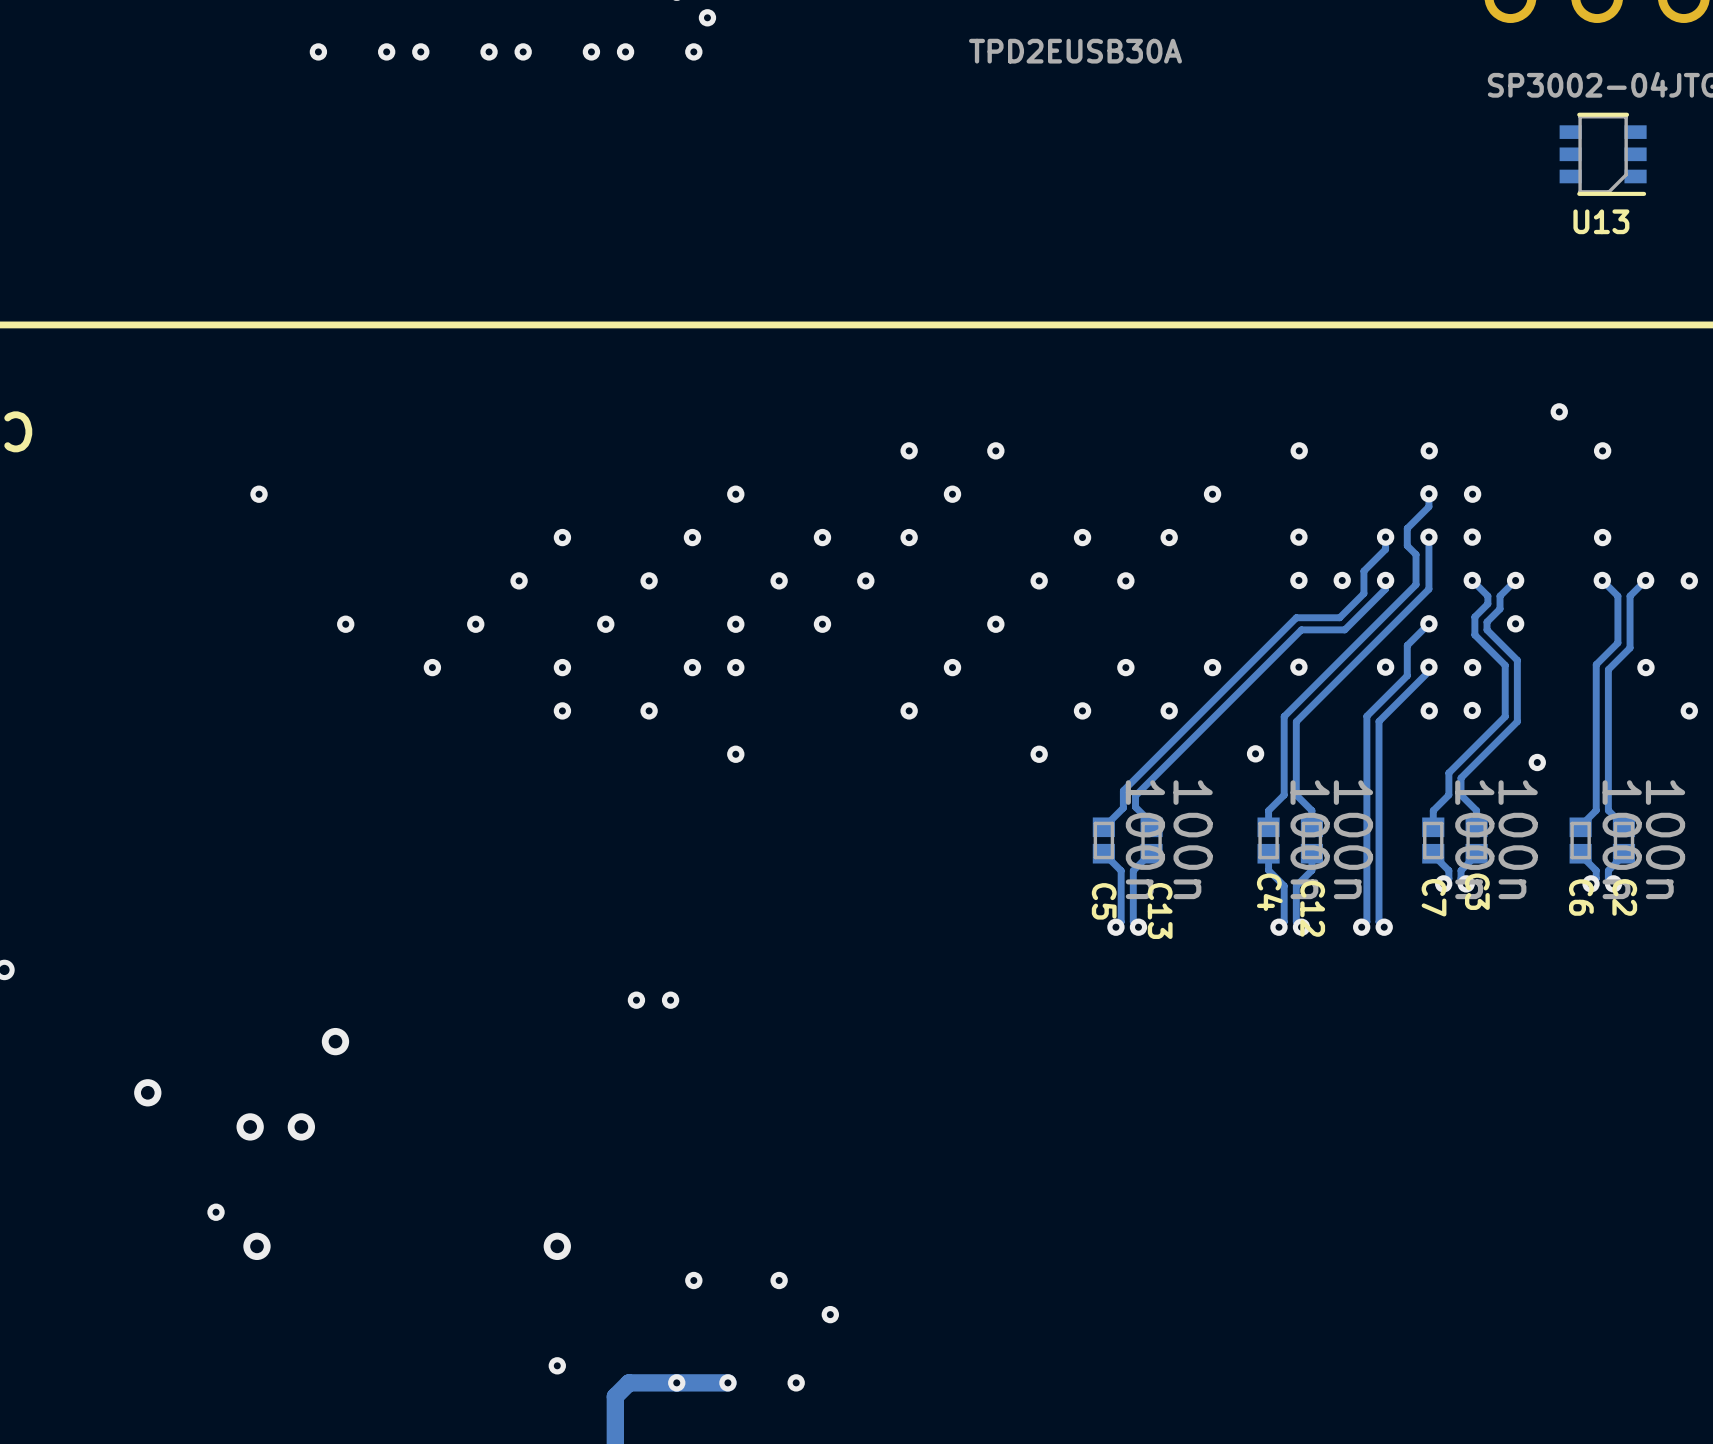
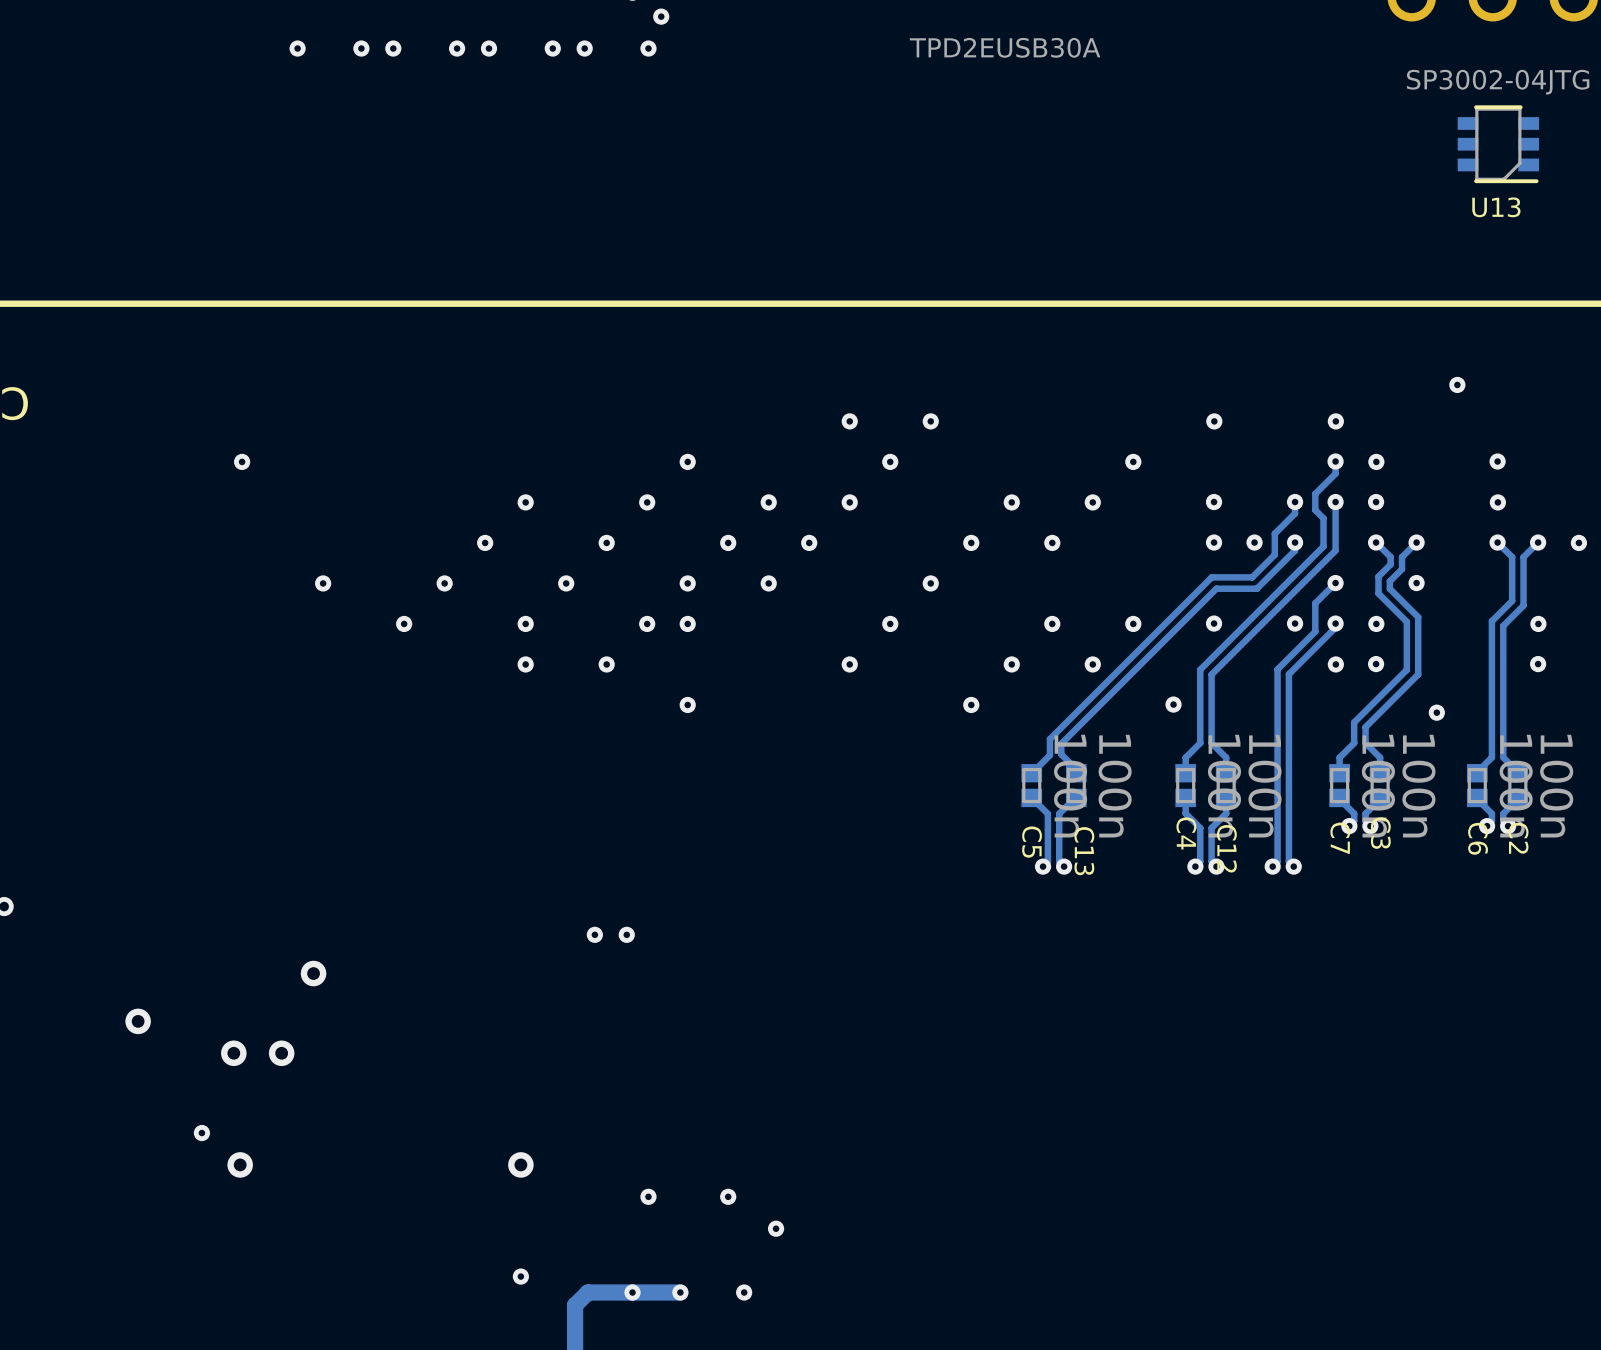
via position: (1602, 450) -> (1497, 461)
via: none -> (1538, 664)
via: (1689, 710) -> none

